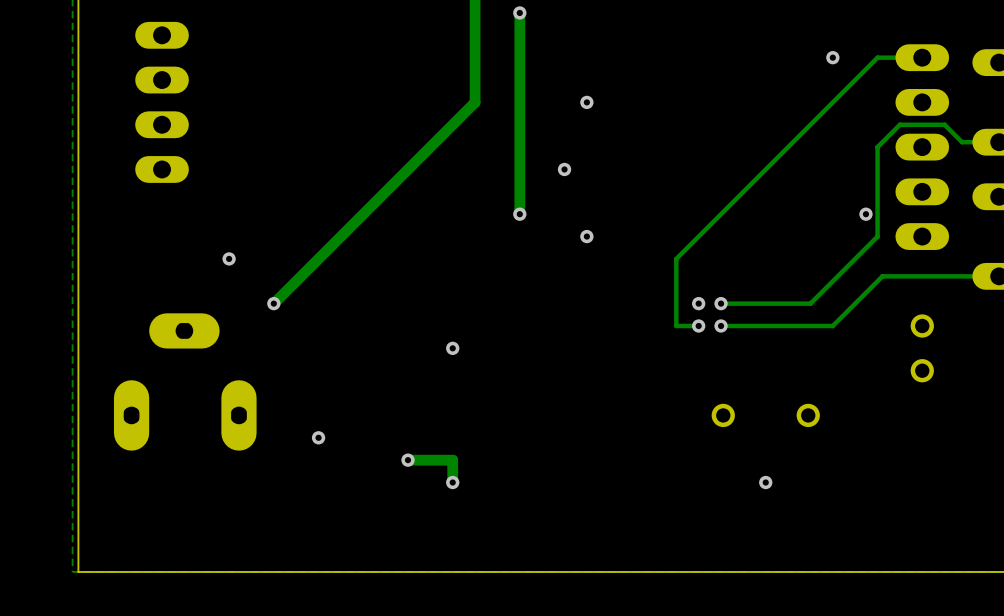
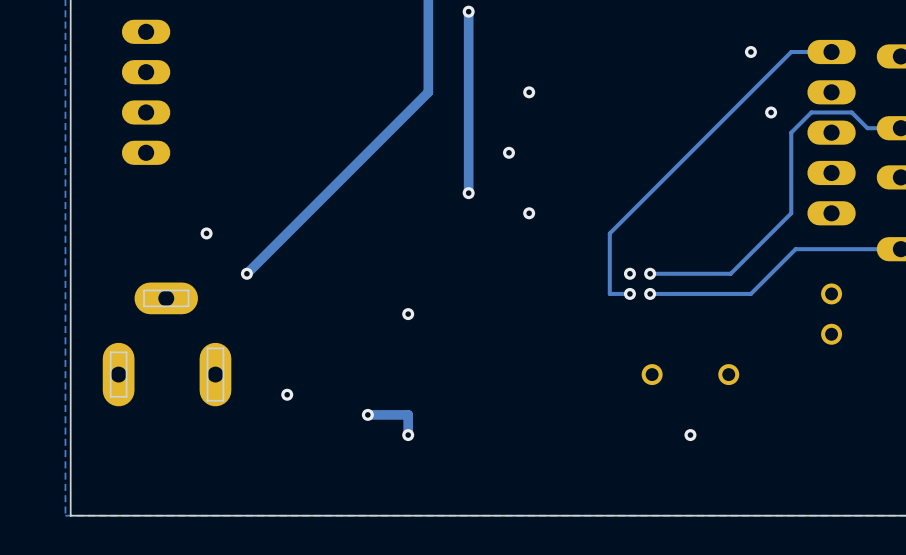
via position: (865, 214) -> (771, 112)

